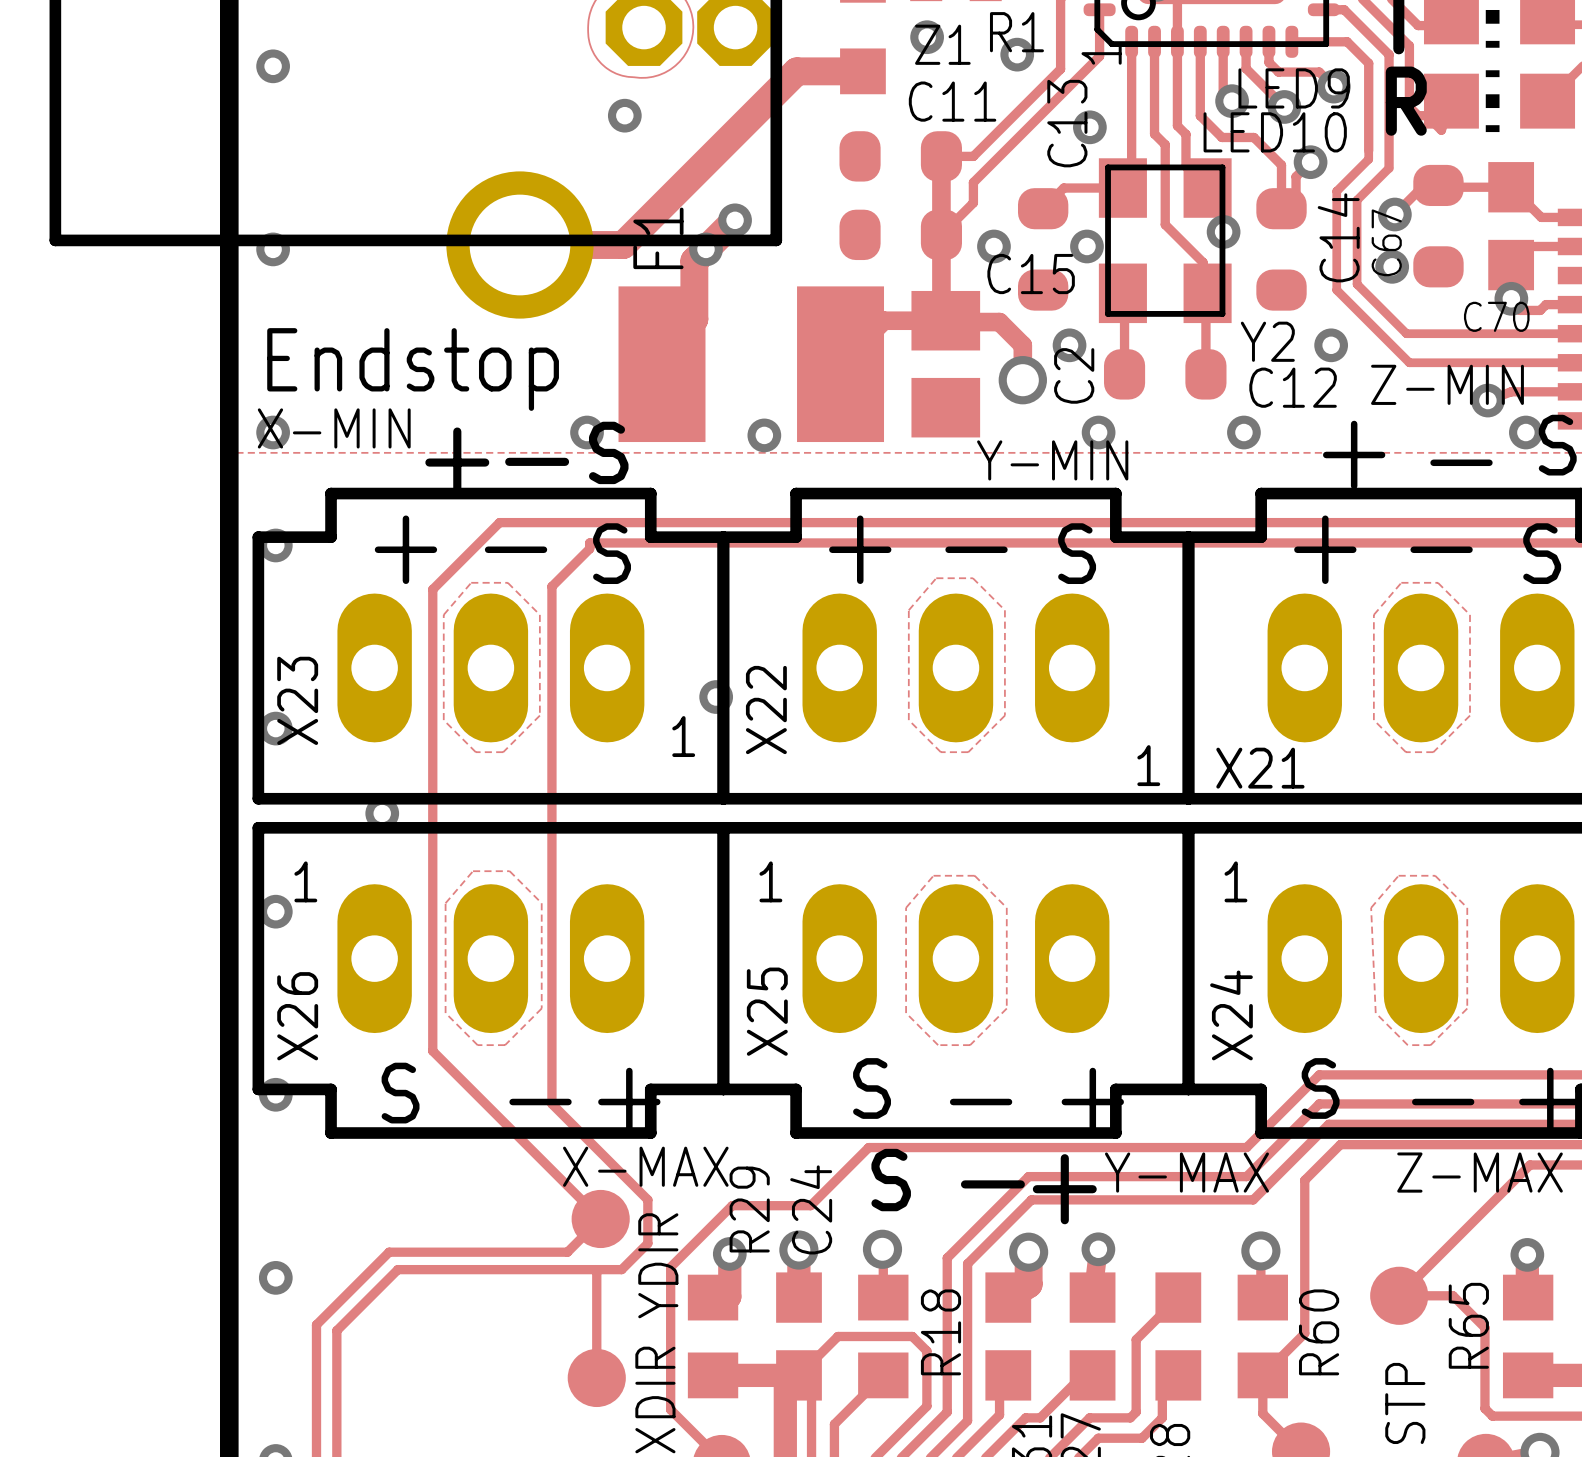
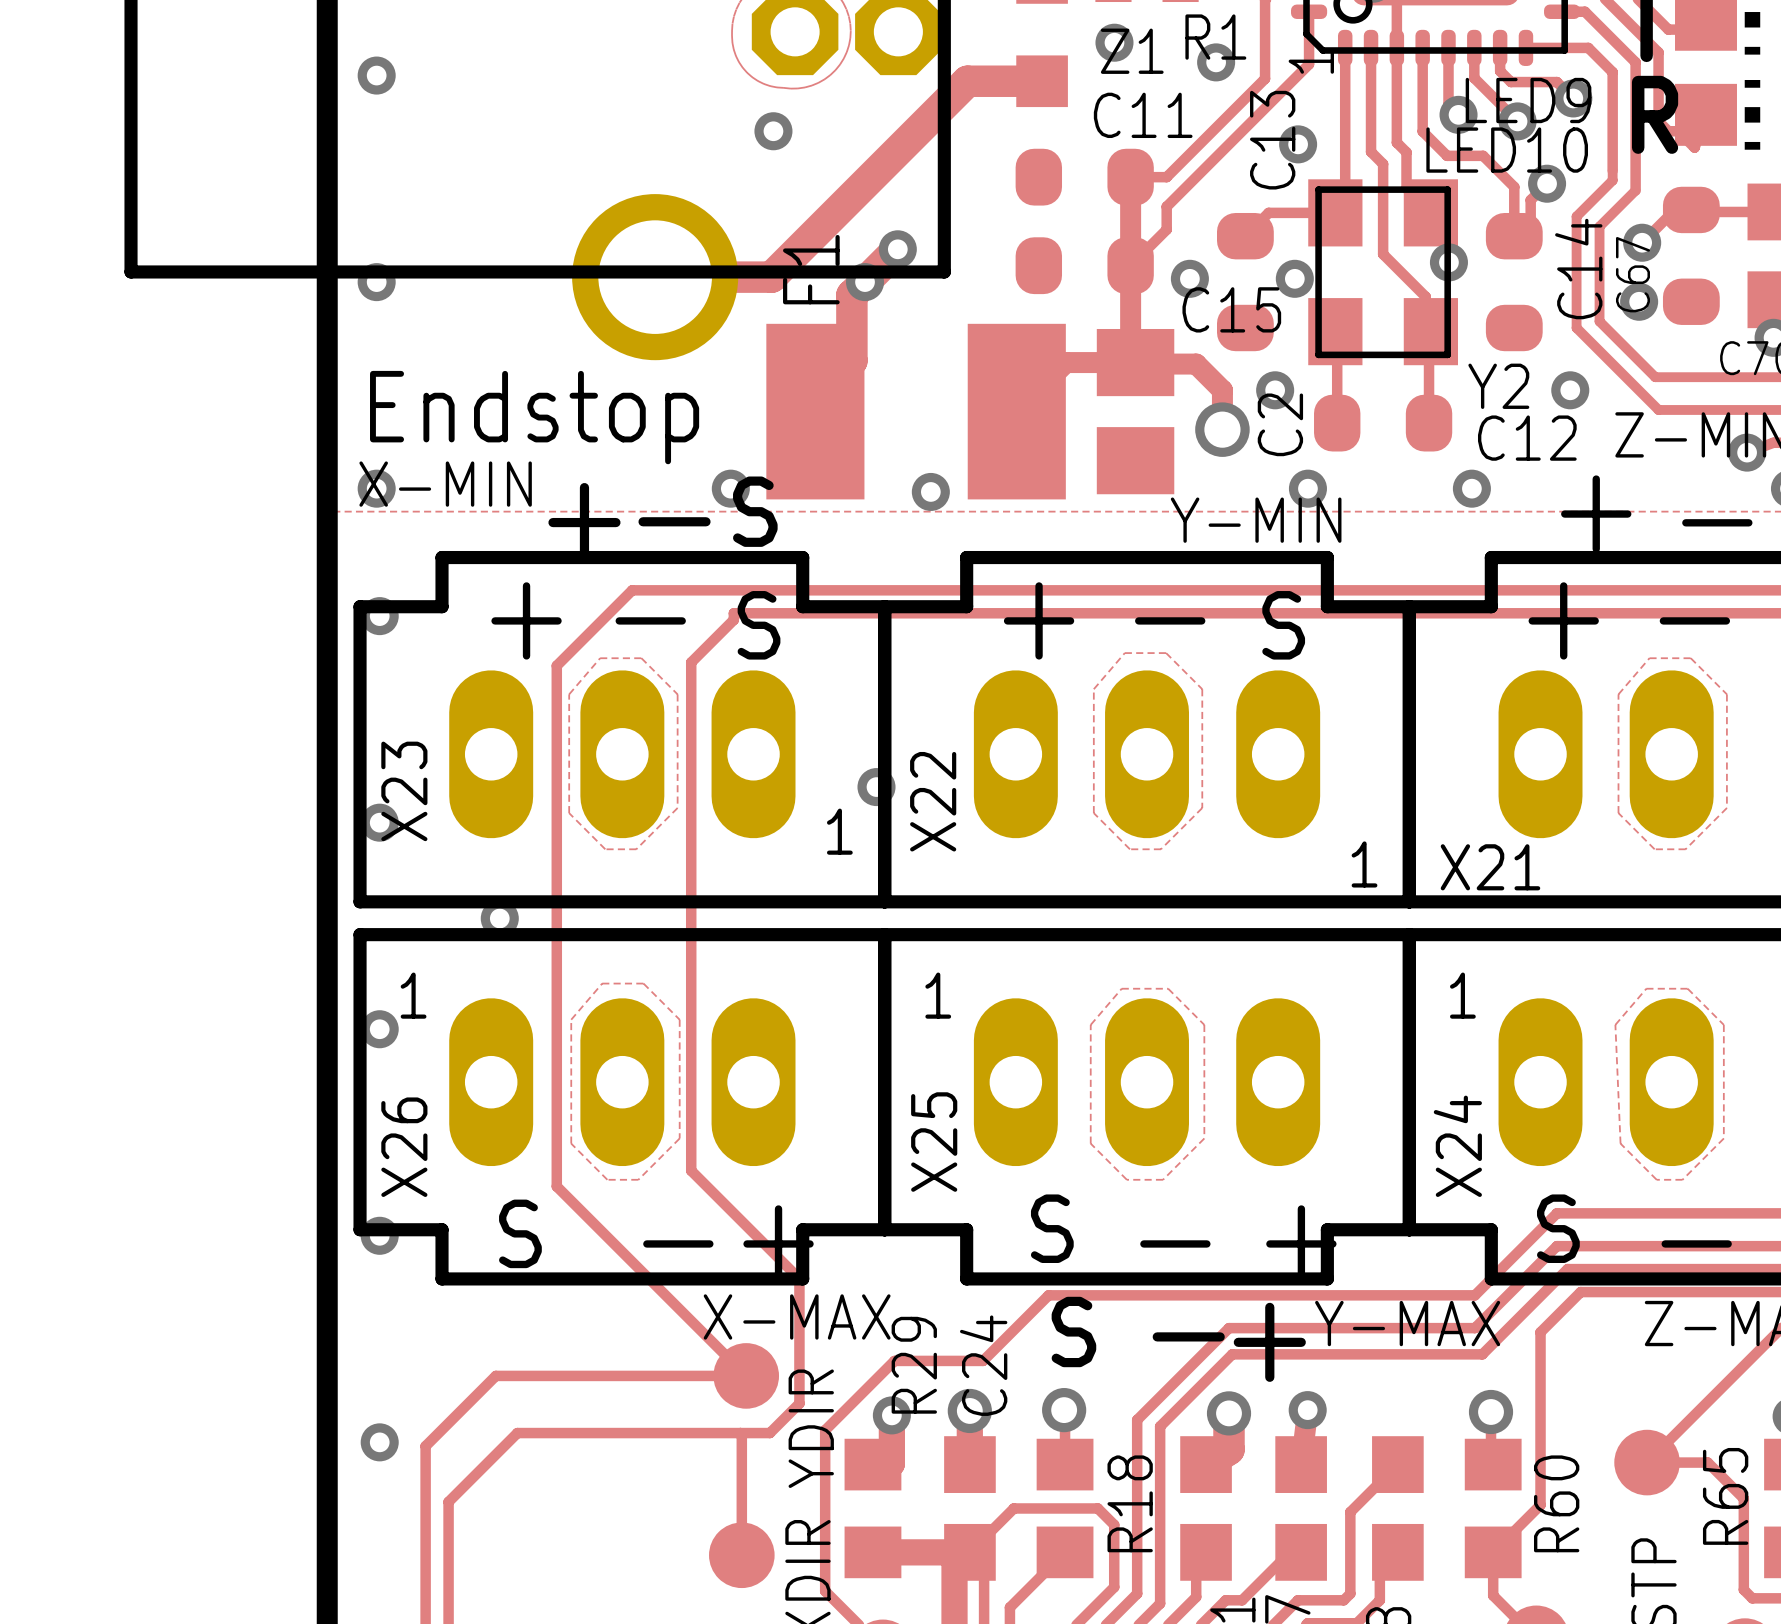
track: (551, 1037) (551, 1103) (647, 1199) -> (691, 1170) (799, 1278) (799, 1354)
track: (600, 1218) (567, 1252) (389, 1252) (316, 1324) -> (746, 1375) (495, 1375) (425, 1446) (425, 1495)

